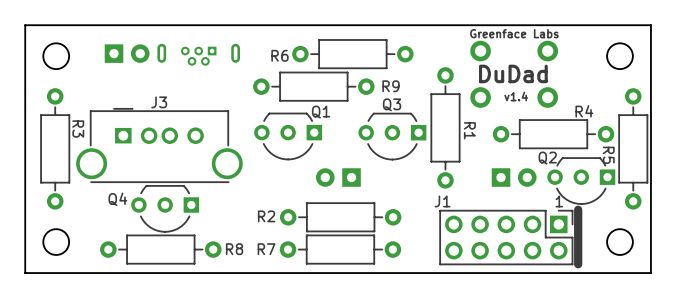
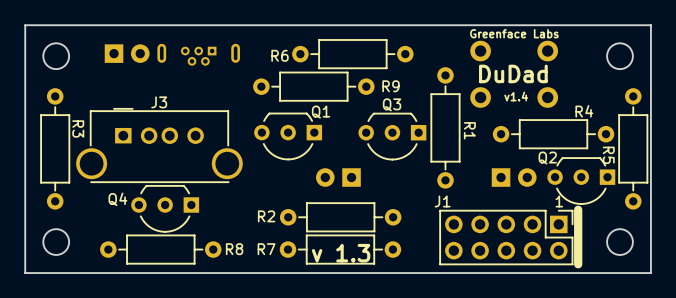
text: none -> v 1.3 (341, 253)

